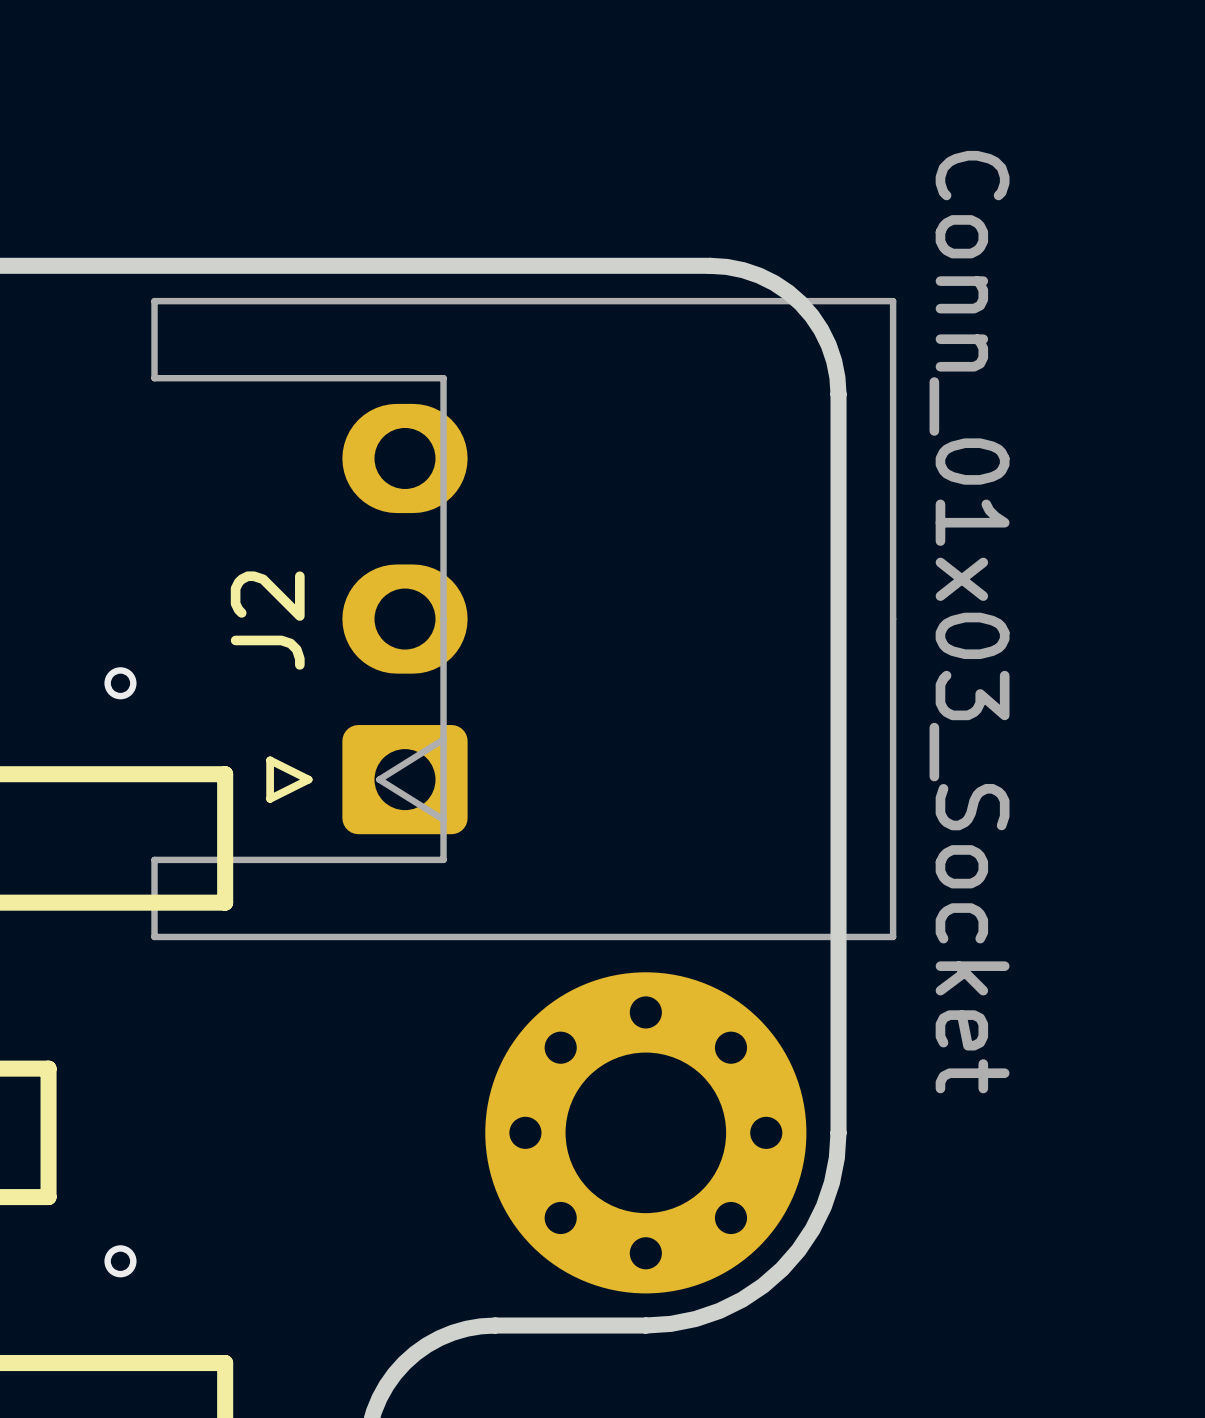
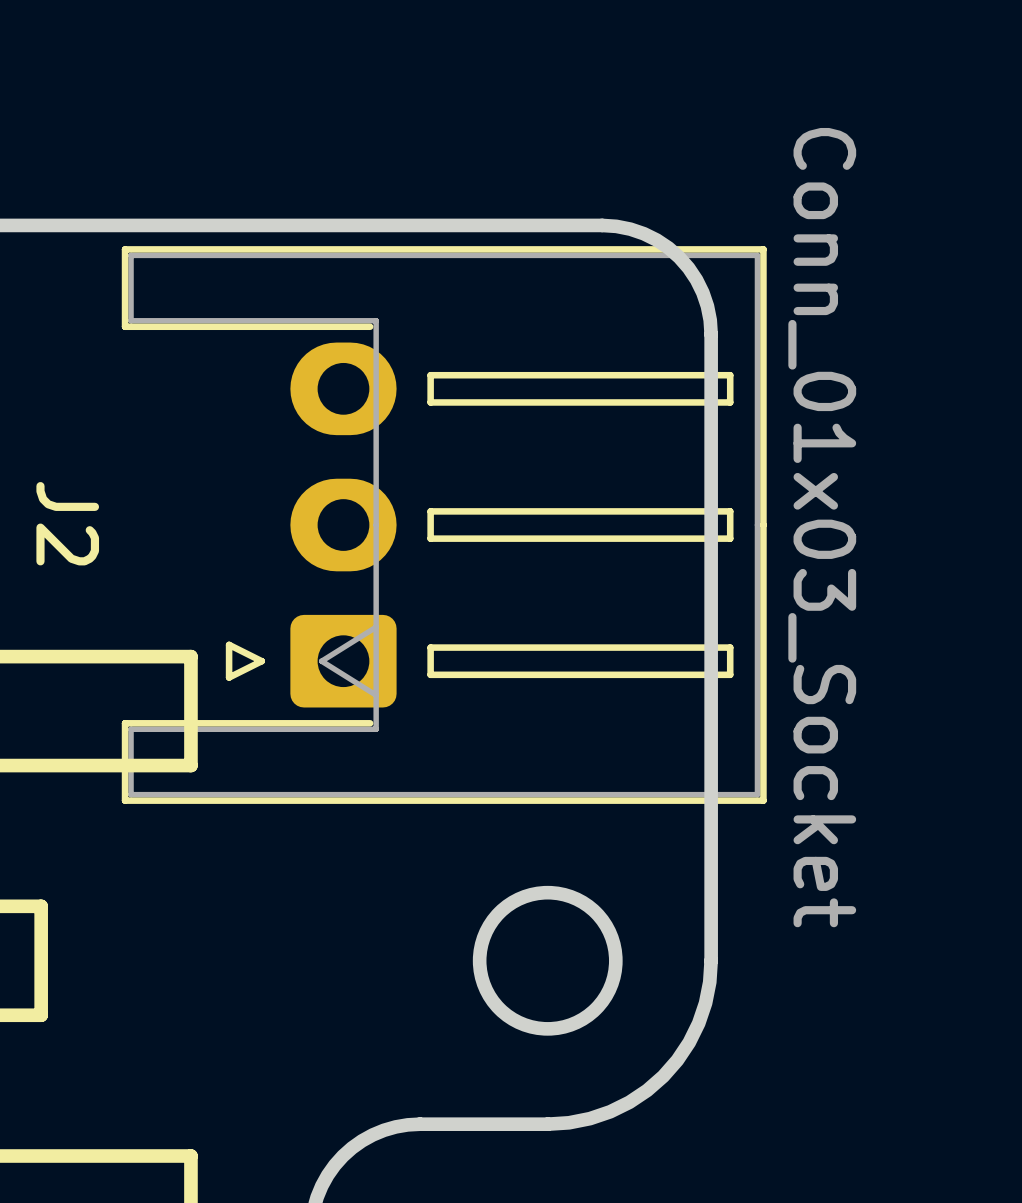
J2 footprint: [151, 297, 897, 941] -> [121, 246, 767, 804]
J2 name position: J2 (267, 620) -> J2 (67, 523)
via: (120, 683) -> none
round board edge: none -> [472, 885, 623, 1036]
part: (645, 1132) -> none
via: (120, 1261) -> none

